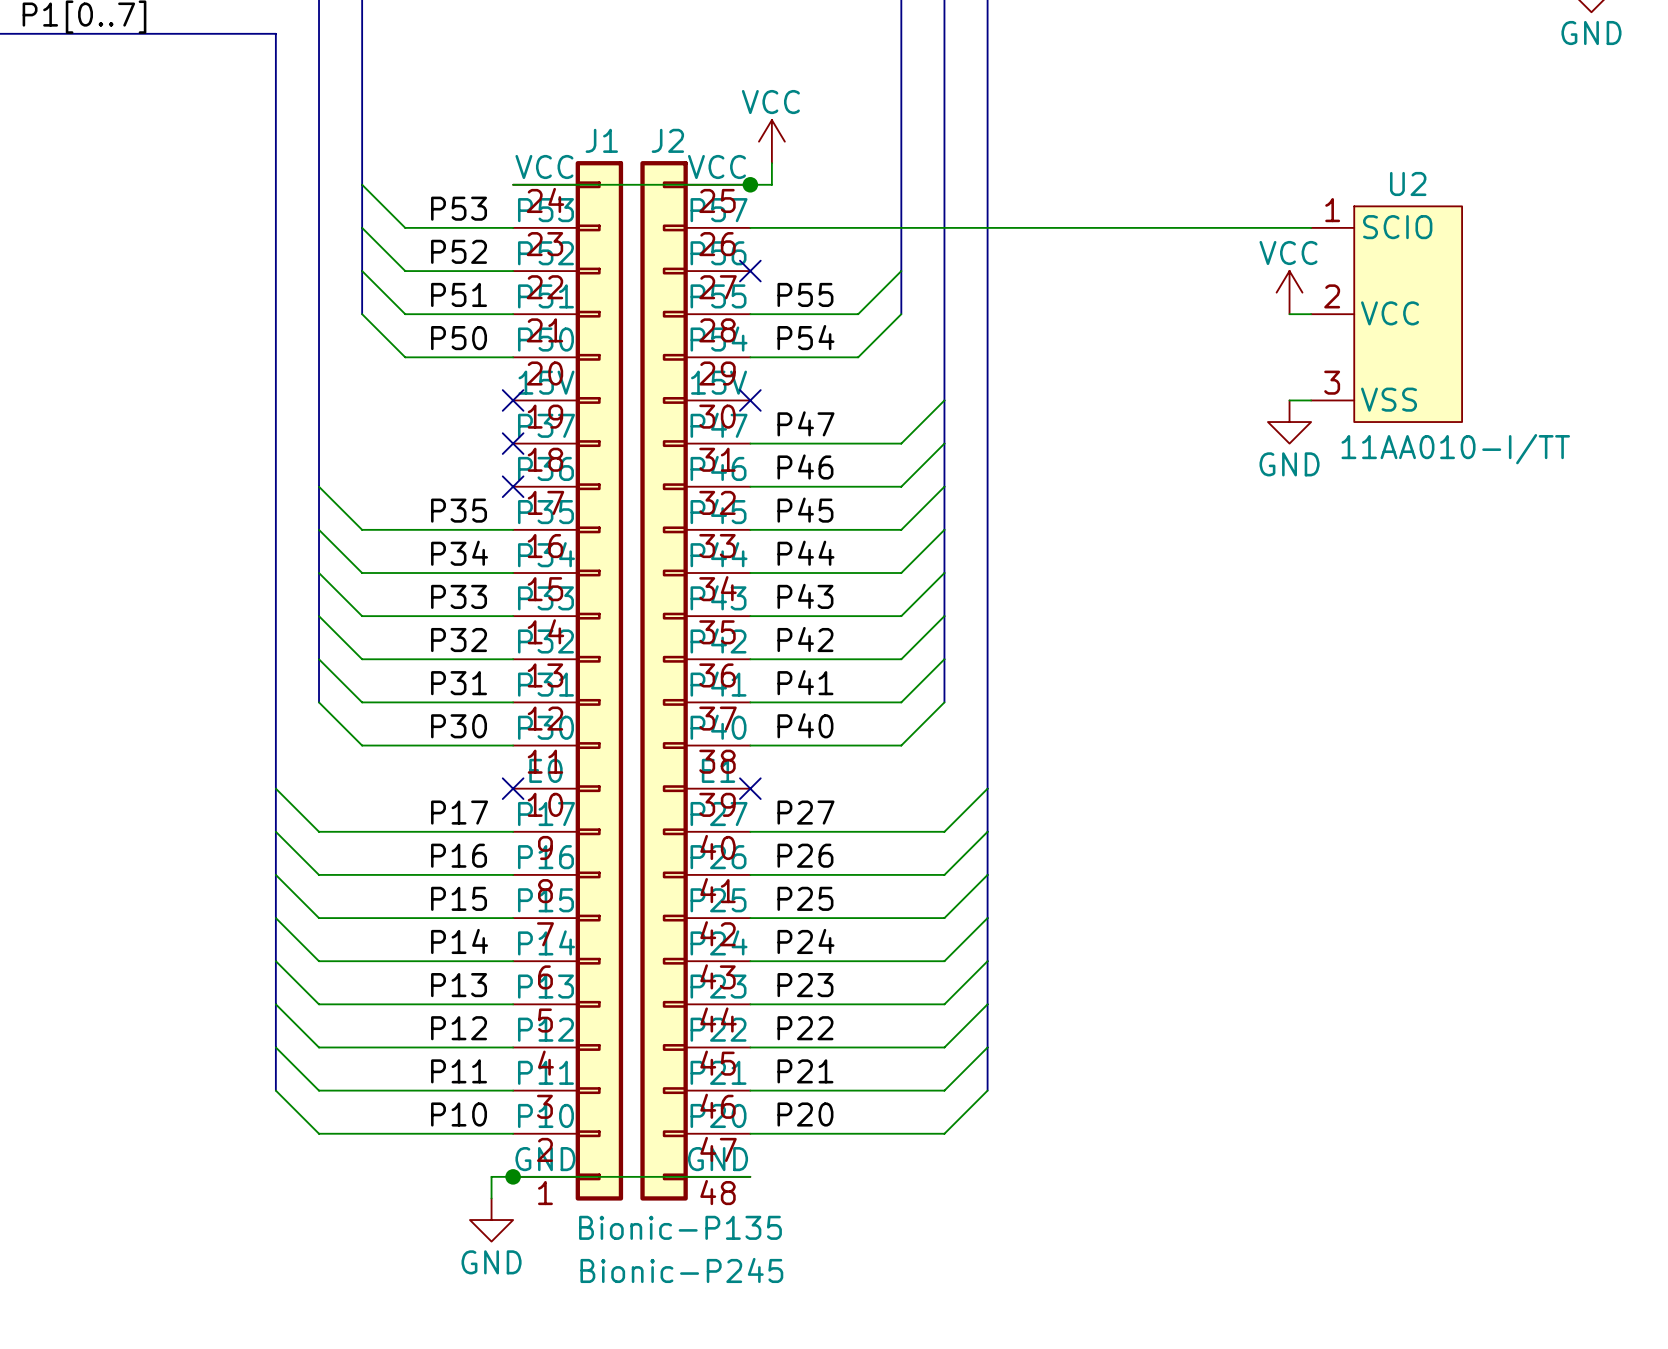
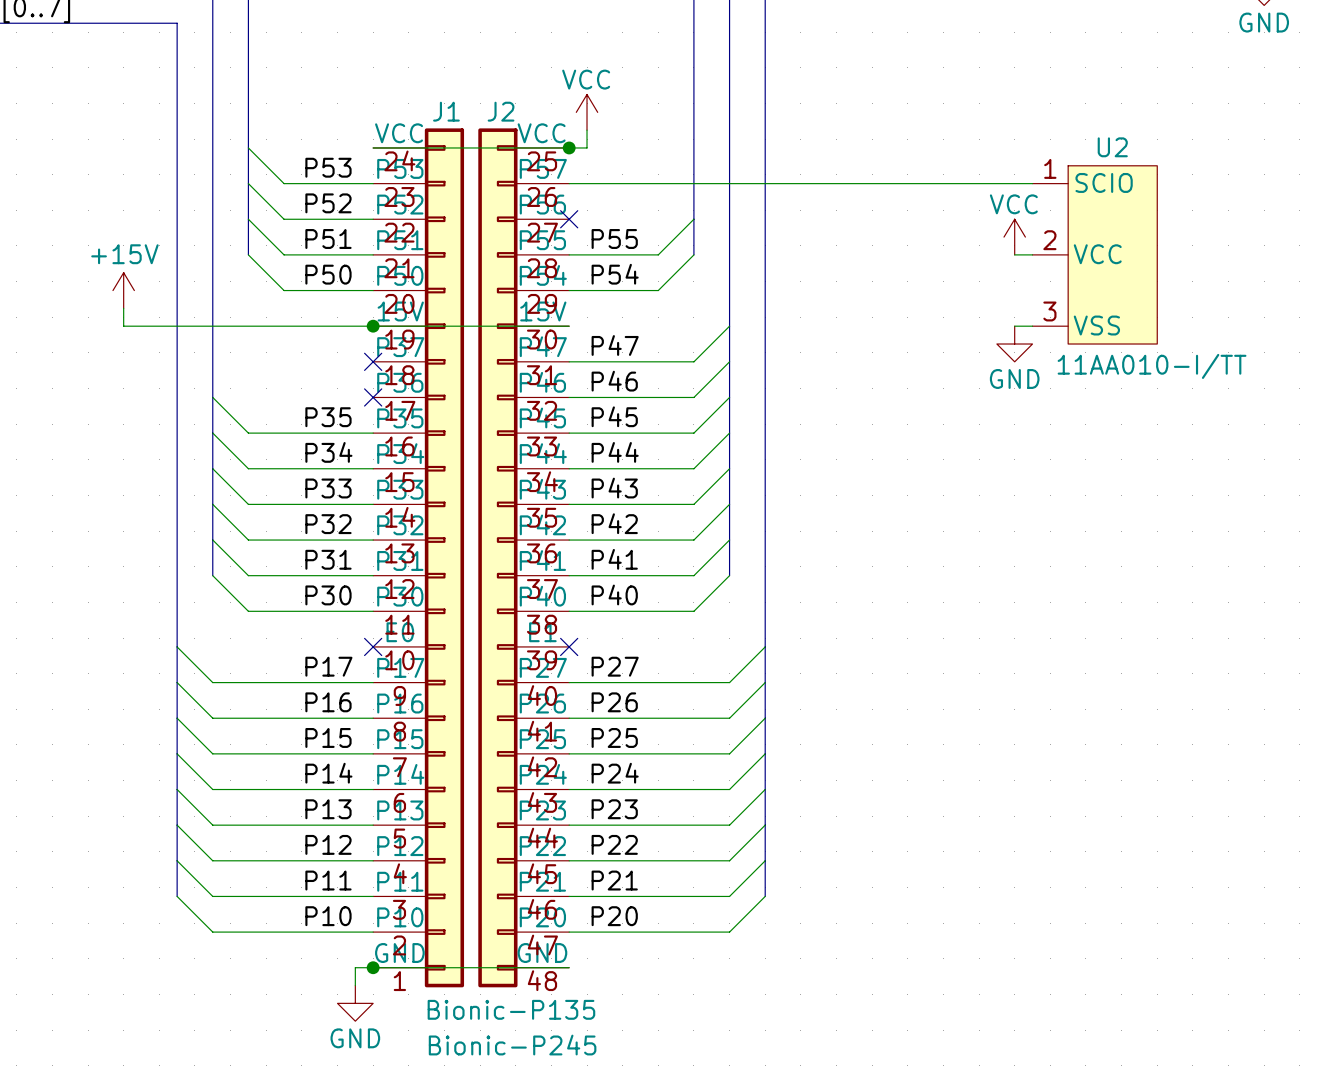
power symbol: none -> +15V (123, 290)
wire: none -> (123, 308) (123, 326) (569, 326)
no-connect mark: (513, 400) -> none
junction: none -> (373, 326)
no-connect mark: (750, 400) -> none

